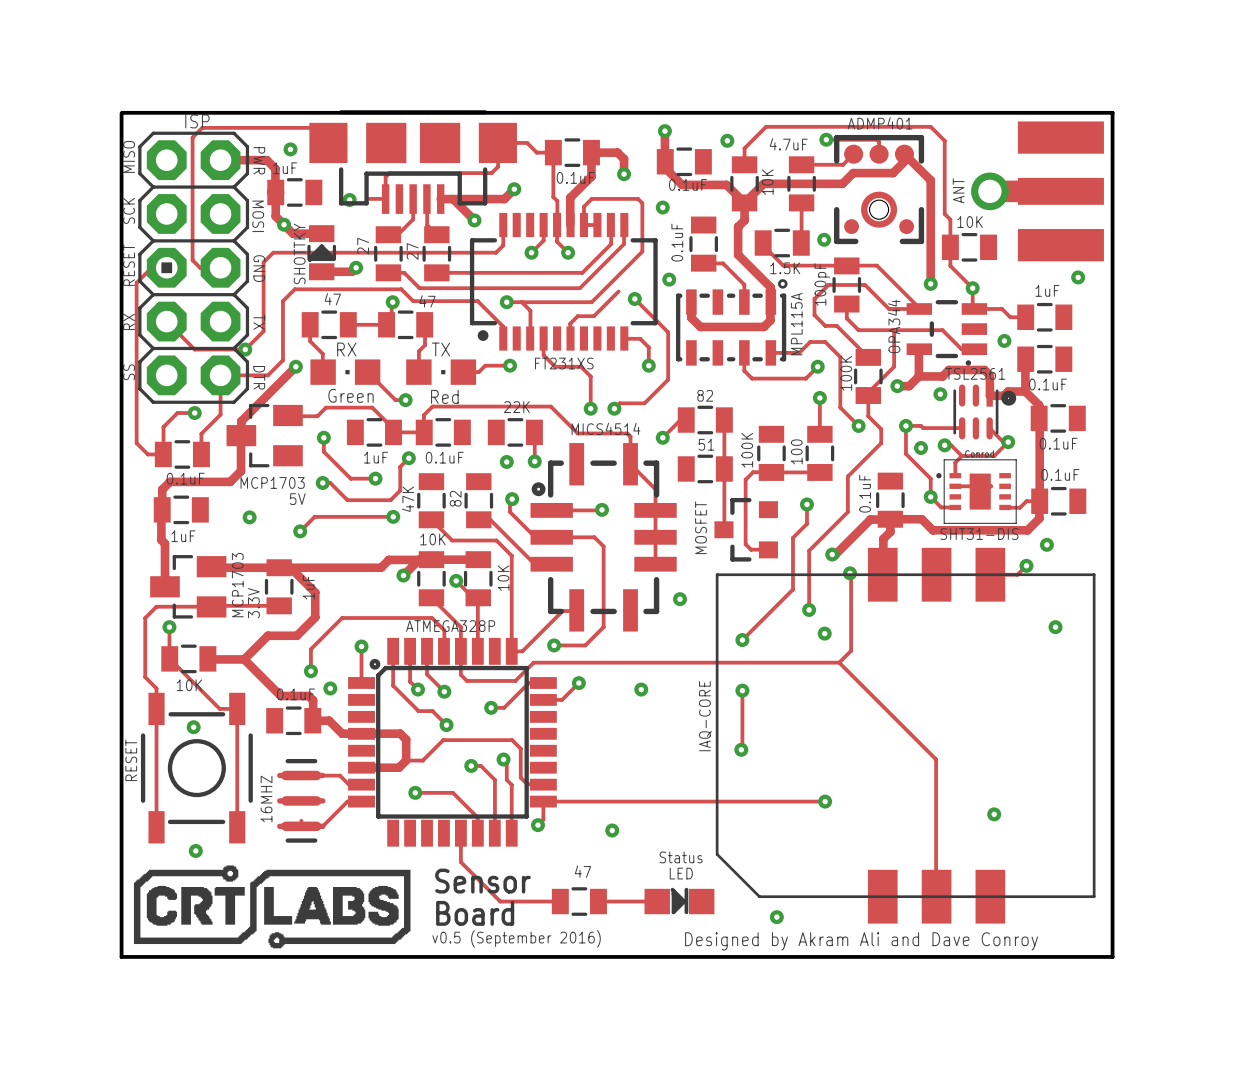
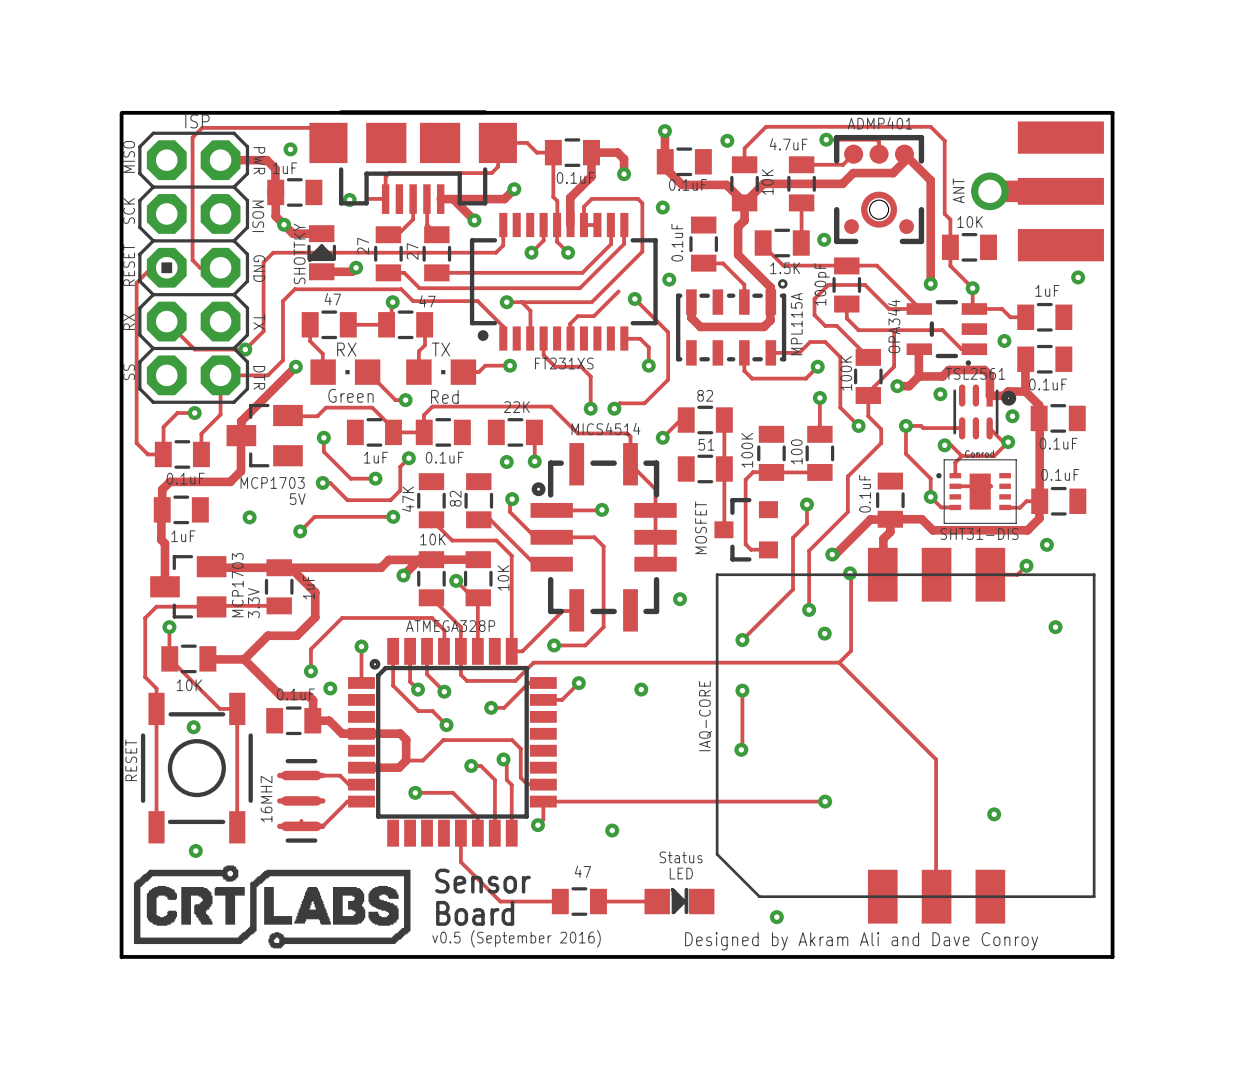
via position: (921, 448) -> (1012, 416)

